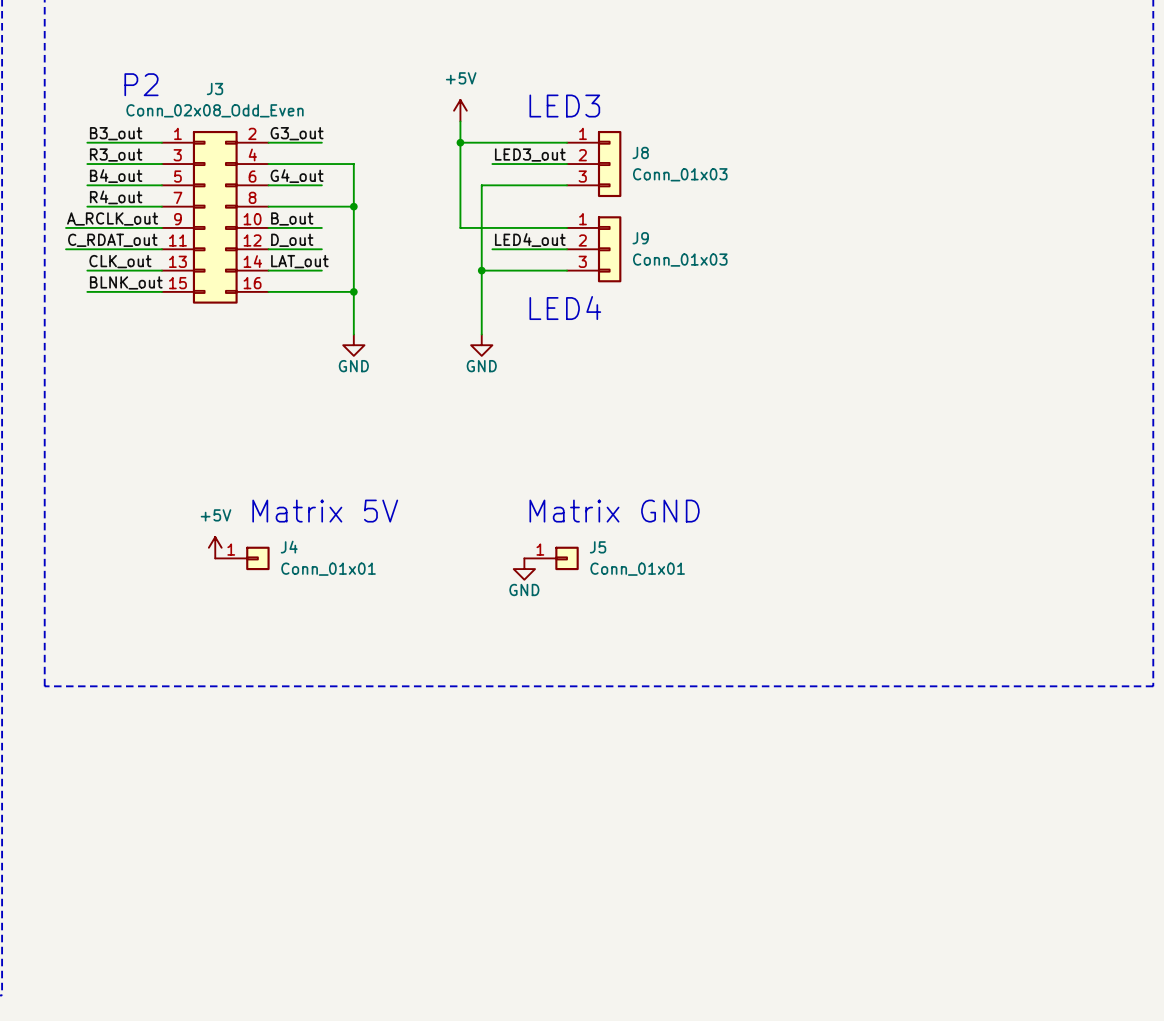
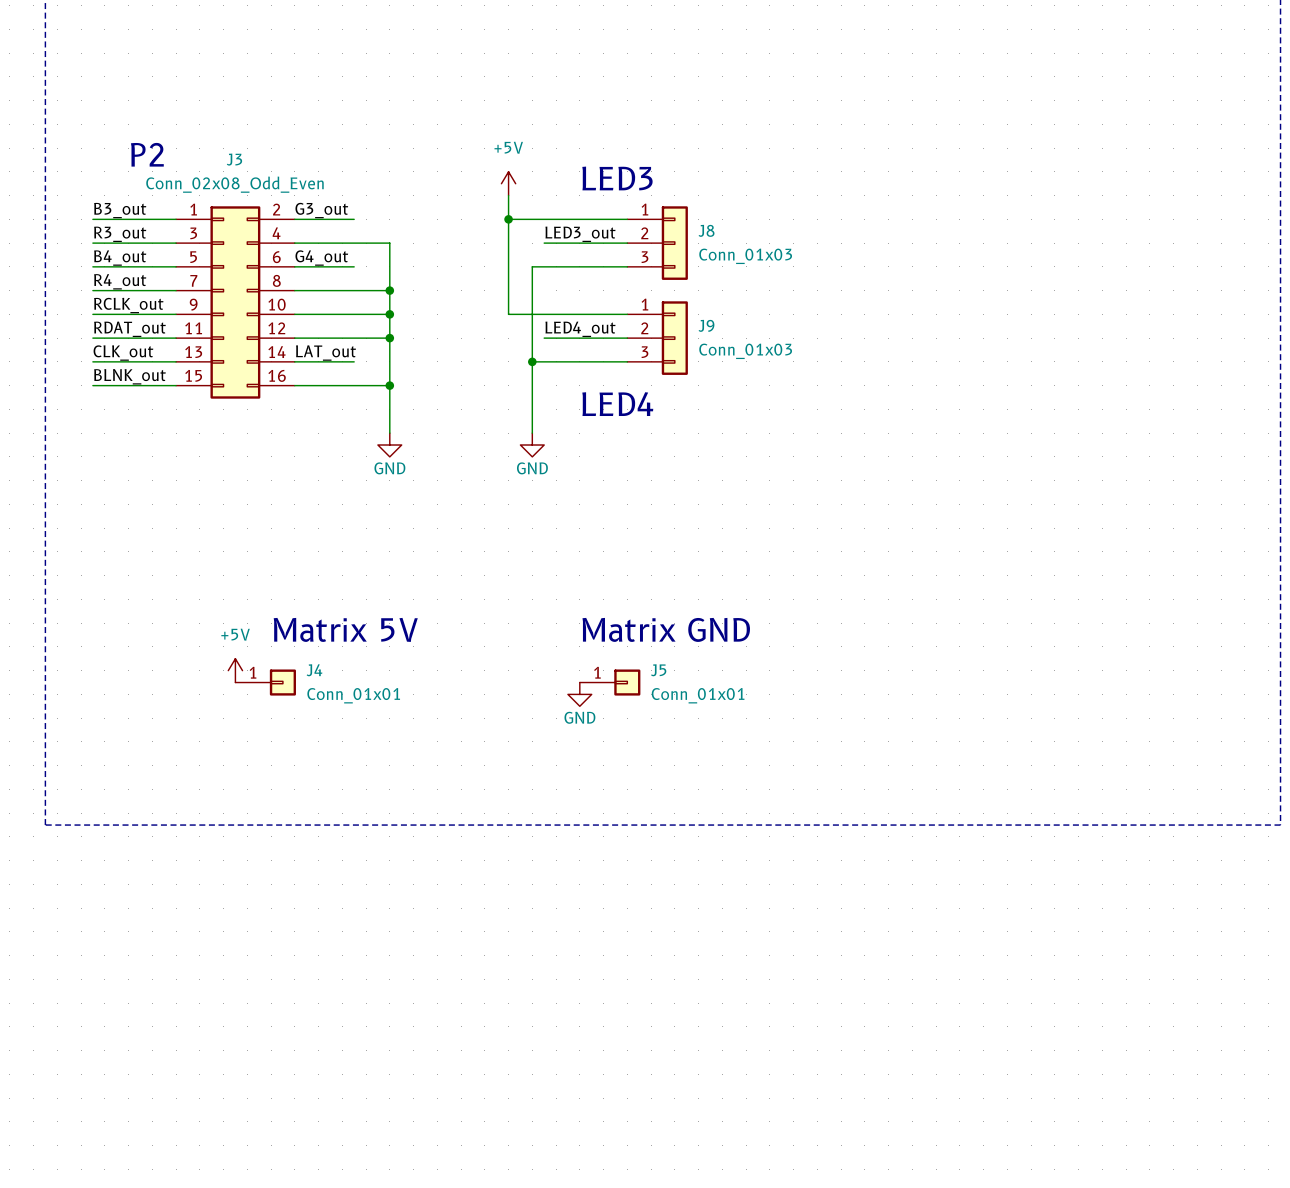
label: A_RCLK_out (112, 218) -> RCLK_out (128, 305)
label: B_out (292, 218) -> none
wire: (66, 227) (87, 227) -> none
wire: none -> (354, 314) (389, 314)
junction: none -> (389, 314)
label: C_RDAT_out (112, 240) -> RDAT_out (129, 329)
label: D_out (292, 240) -> none
wire: (66, 249) (87, 249) -> none
wire: none -> (354, 338) (389, 338)
junction: none -> (389, 338)

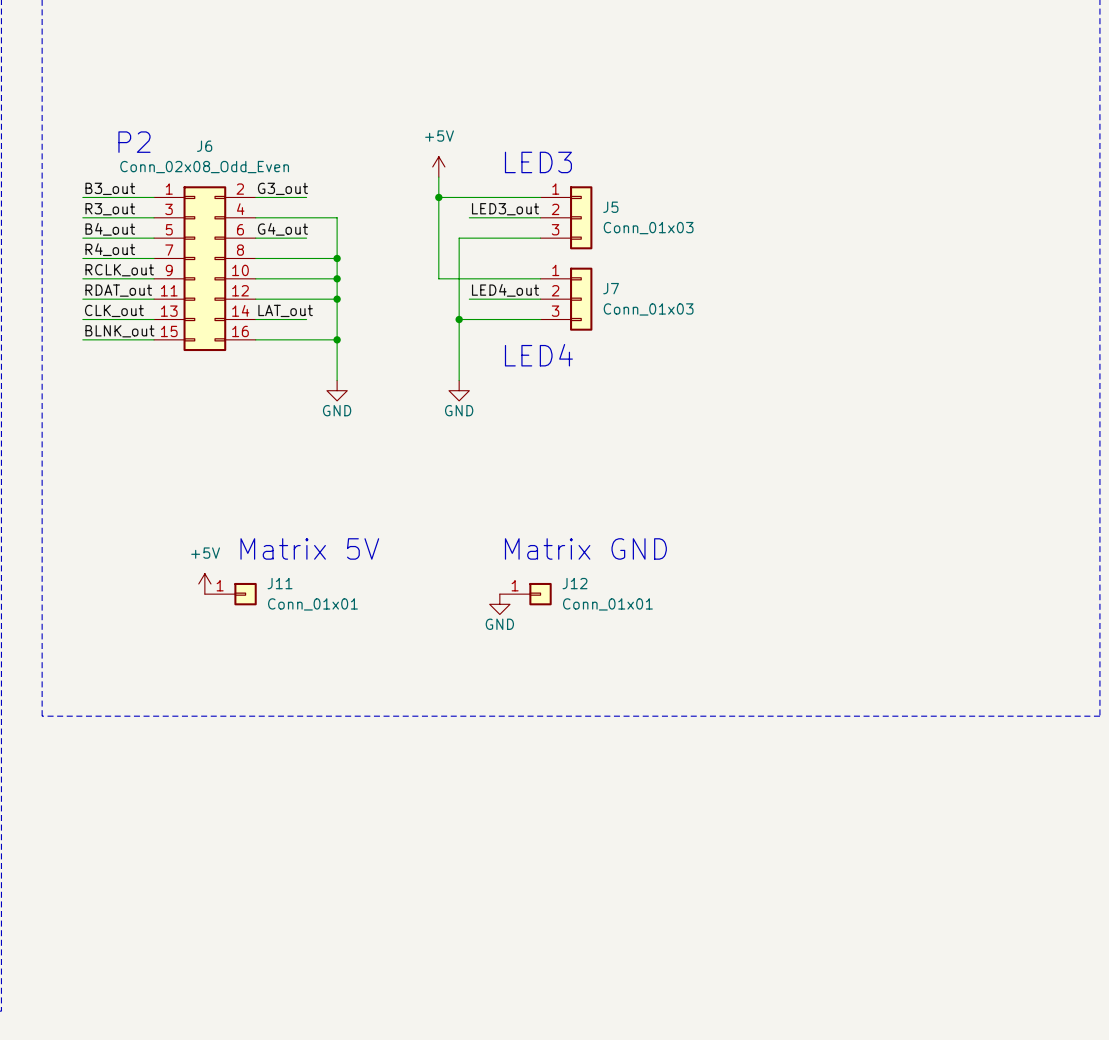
J3 name: J3 (234, 159) -> J6 (204, 146)
J8 name: J8 (706, 230) -> J5 (610, 207)
J9 name: J9 (706, 325) -> J7 (611, 288)
J4 name: J4 (314, 670) -> J11 (280, 583)
J5 name: J5 (658, 670) -> J12 (574, 583)

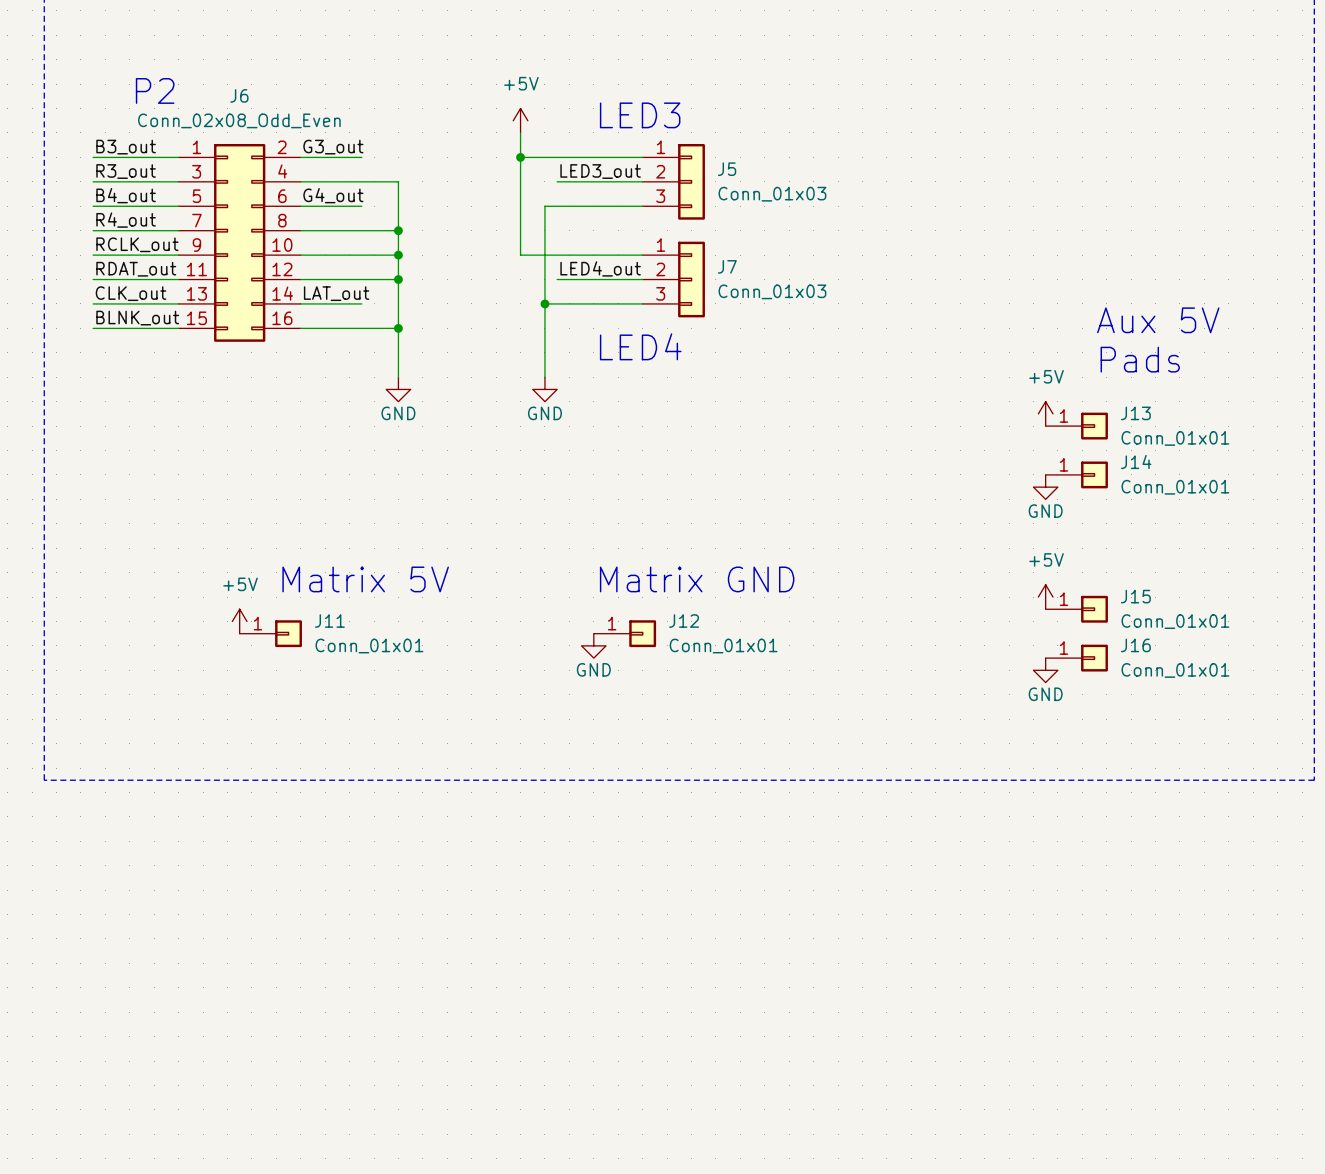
text: none -> Aux 5V (1158, 320)
text: none -> Pads (1140, 359)
power symbol: none -> +5V (1045, 413)
J13: none -> Conn_01x01 (1076, 426)
J14: none -> Conn_01x01 (1076, 474)
power symbol: none -> GND (1045, 487)
power symbol: none -> +5V (1045, 597)
J15: none -> Conn_01x01 (1076, 609)
J16: none -> Conn_01x01 (1076, 658)
power symbol: none -> GND (1045, 670)

